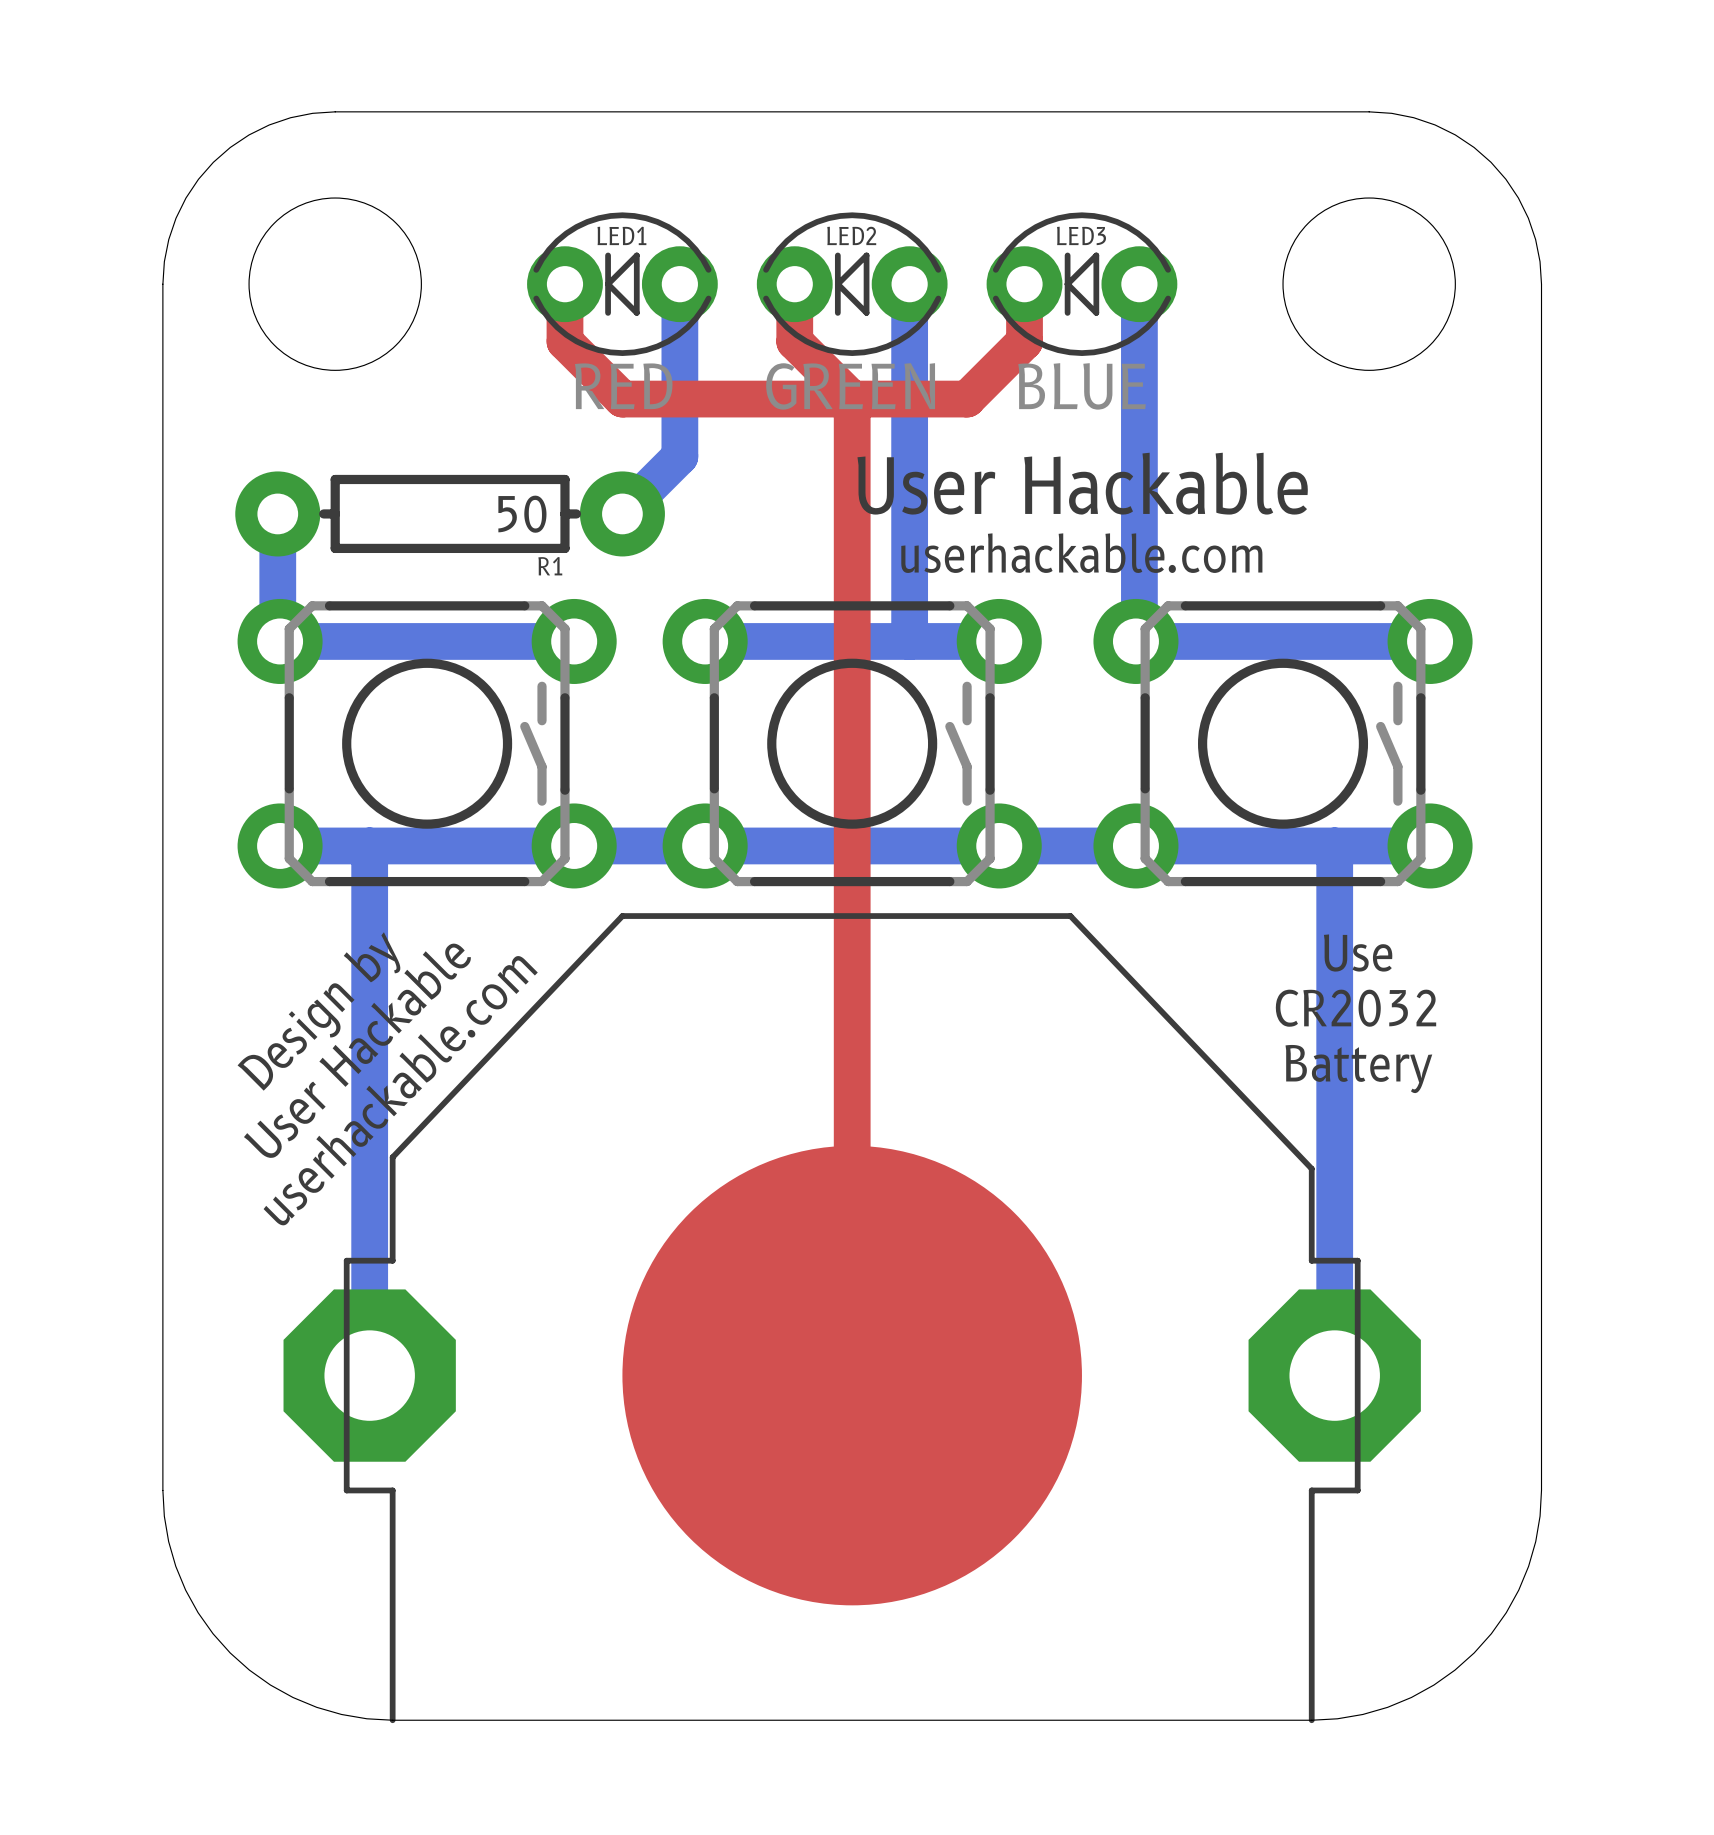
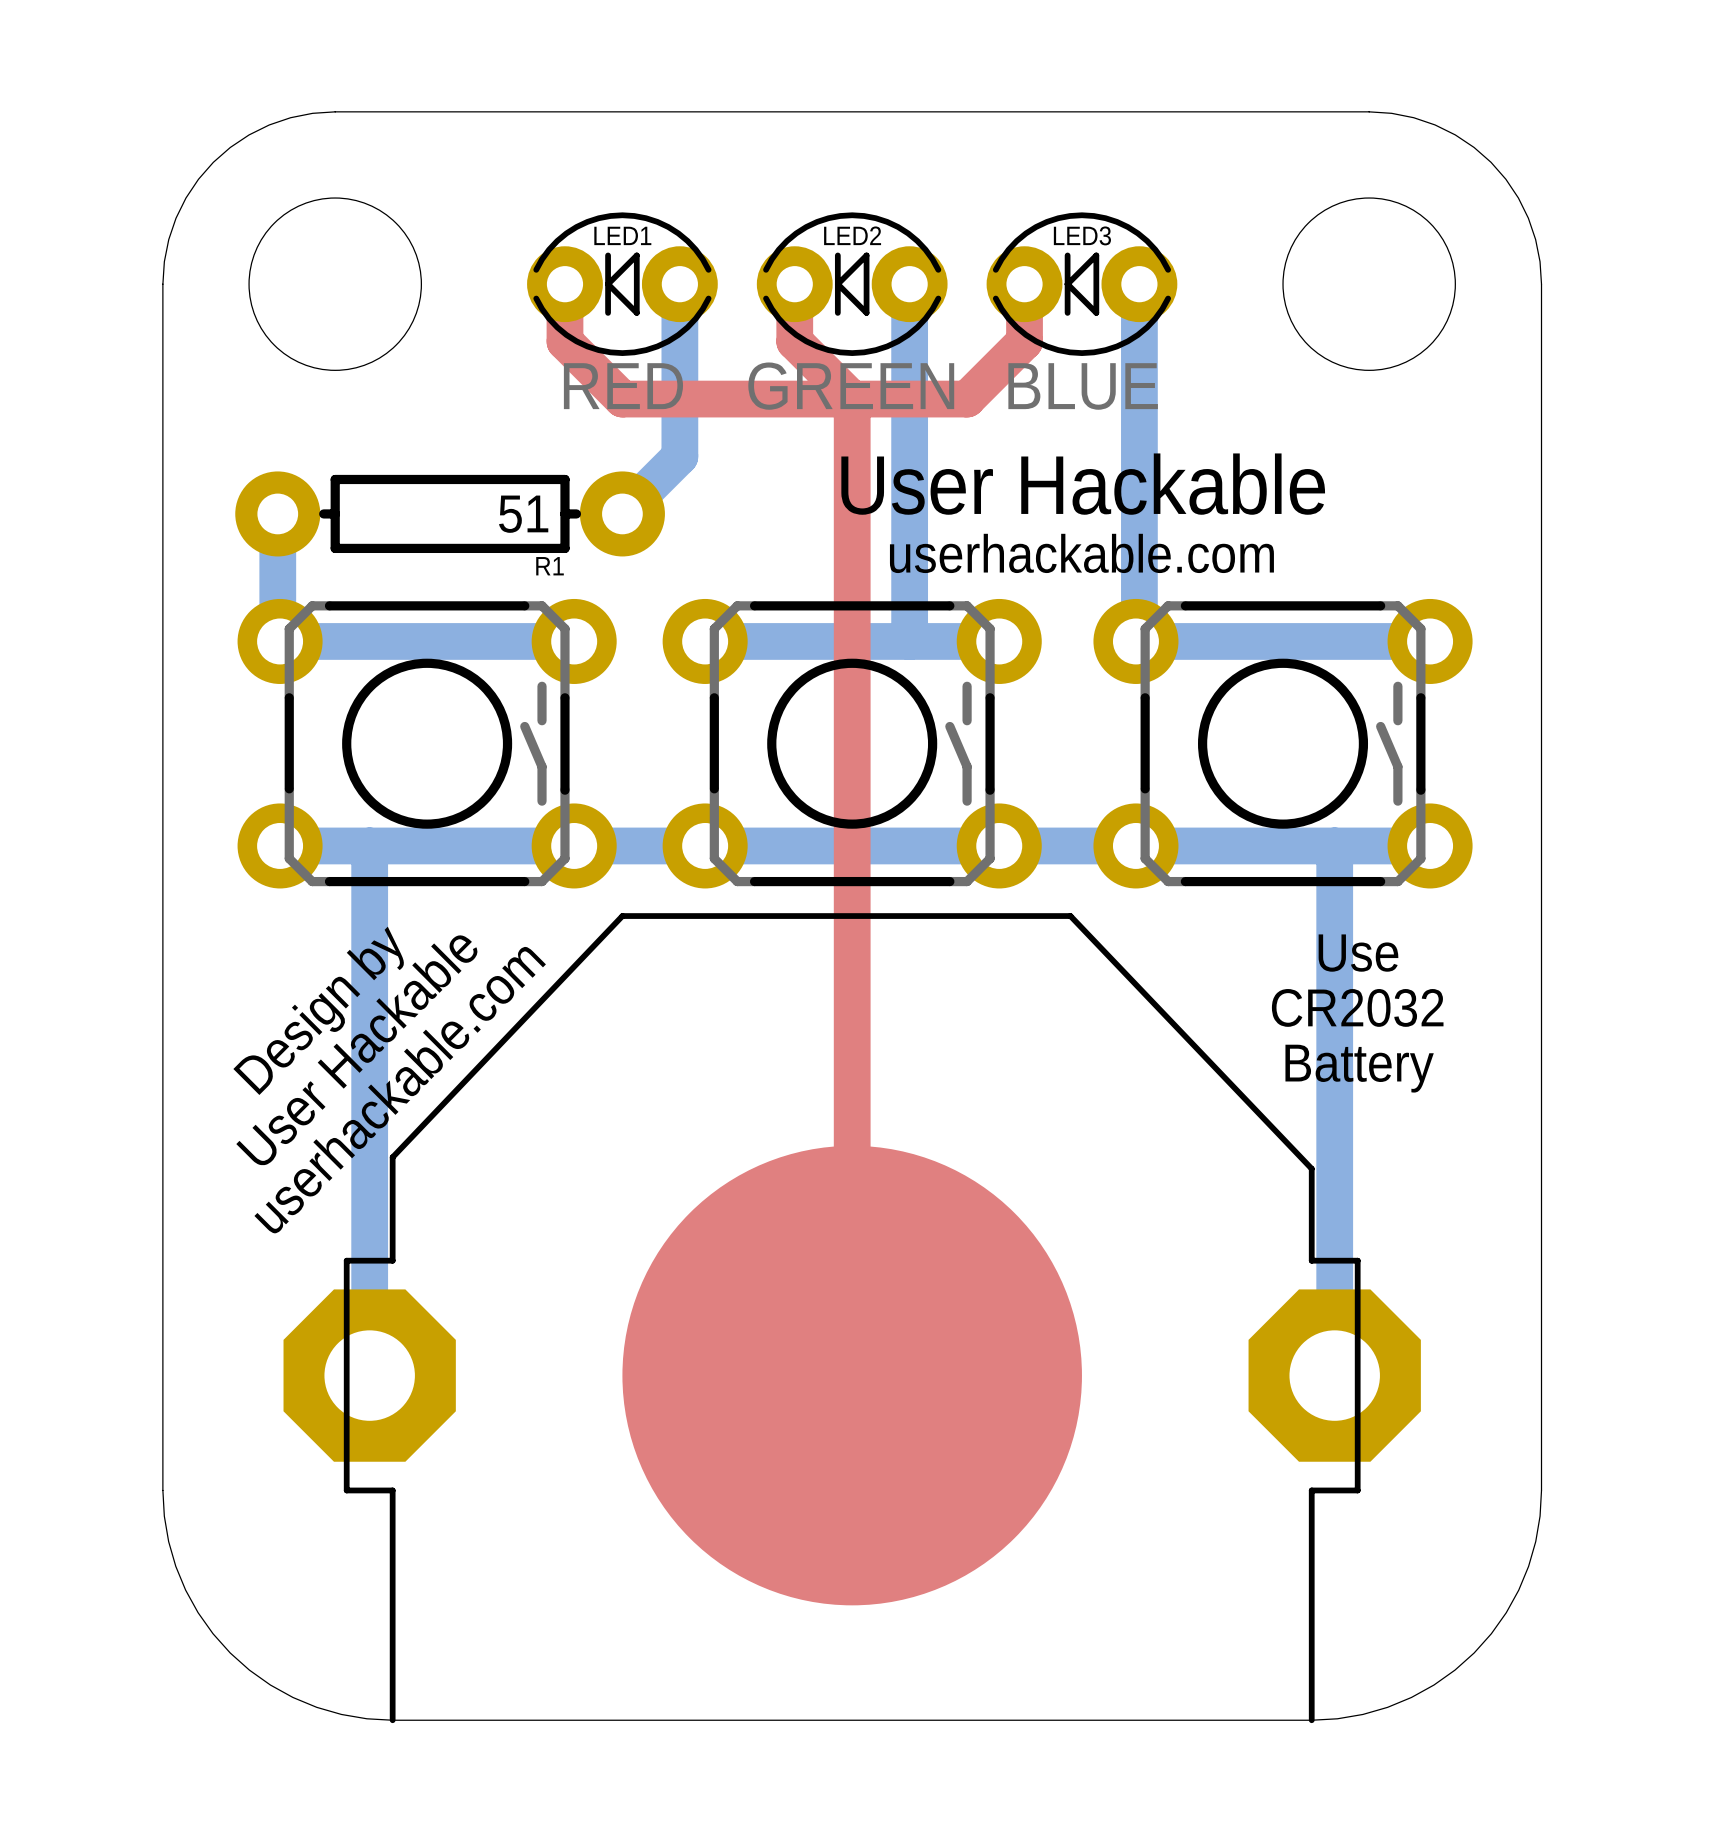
R1 value: 50 (522, 514) -> 51 (523, 514)

